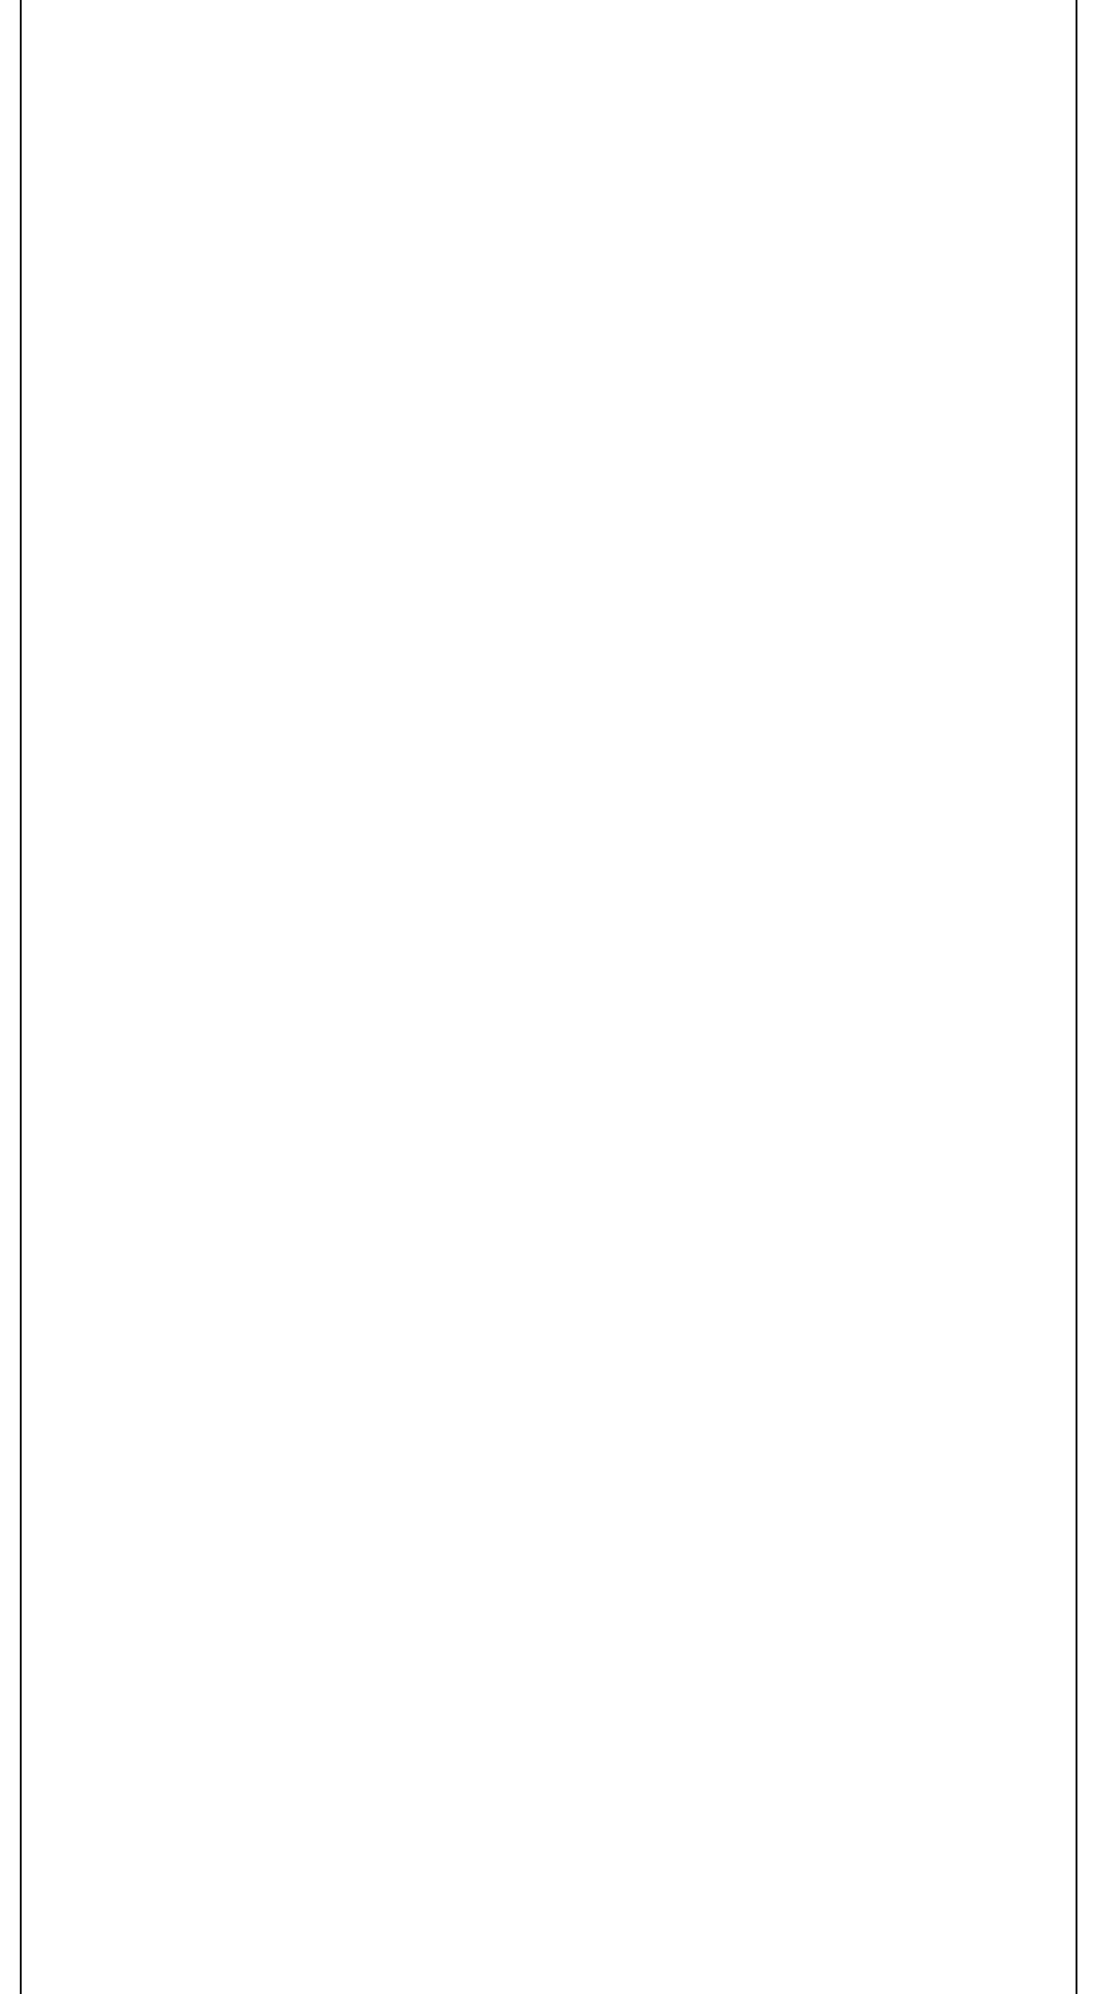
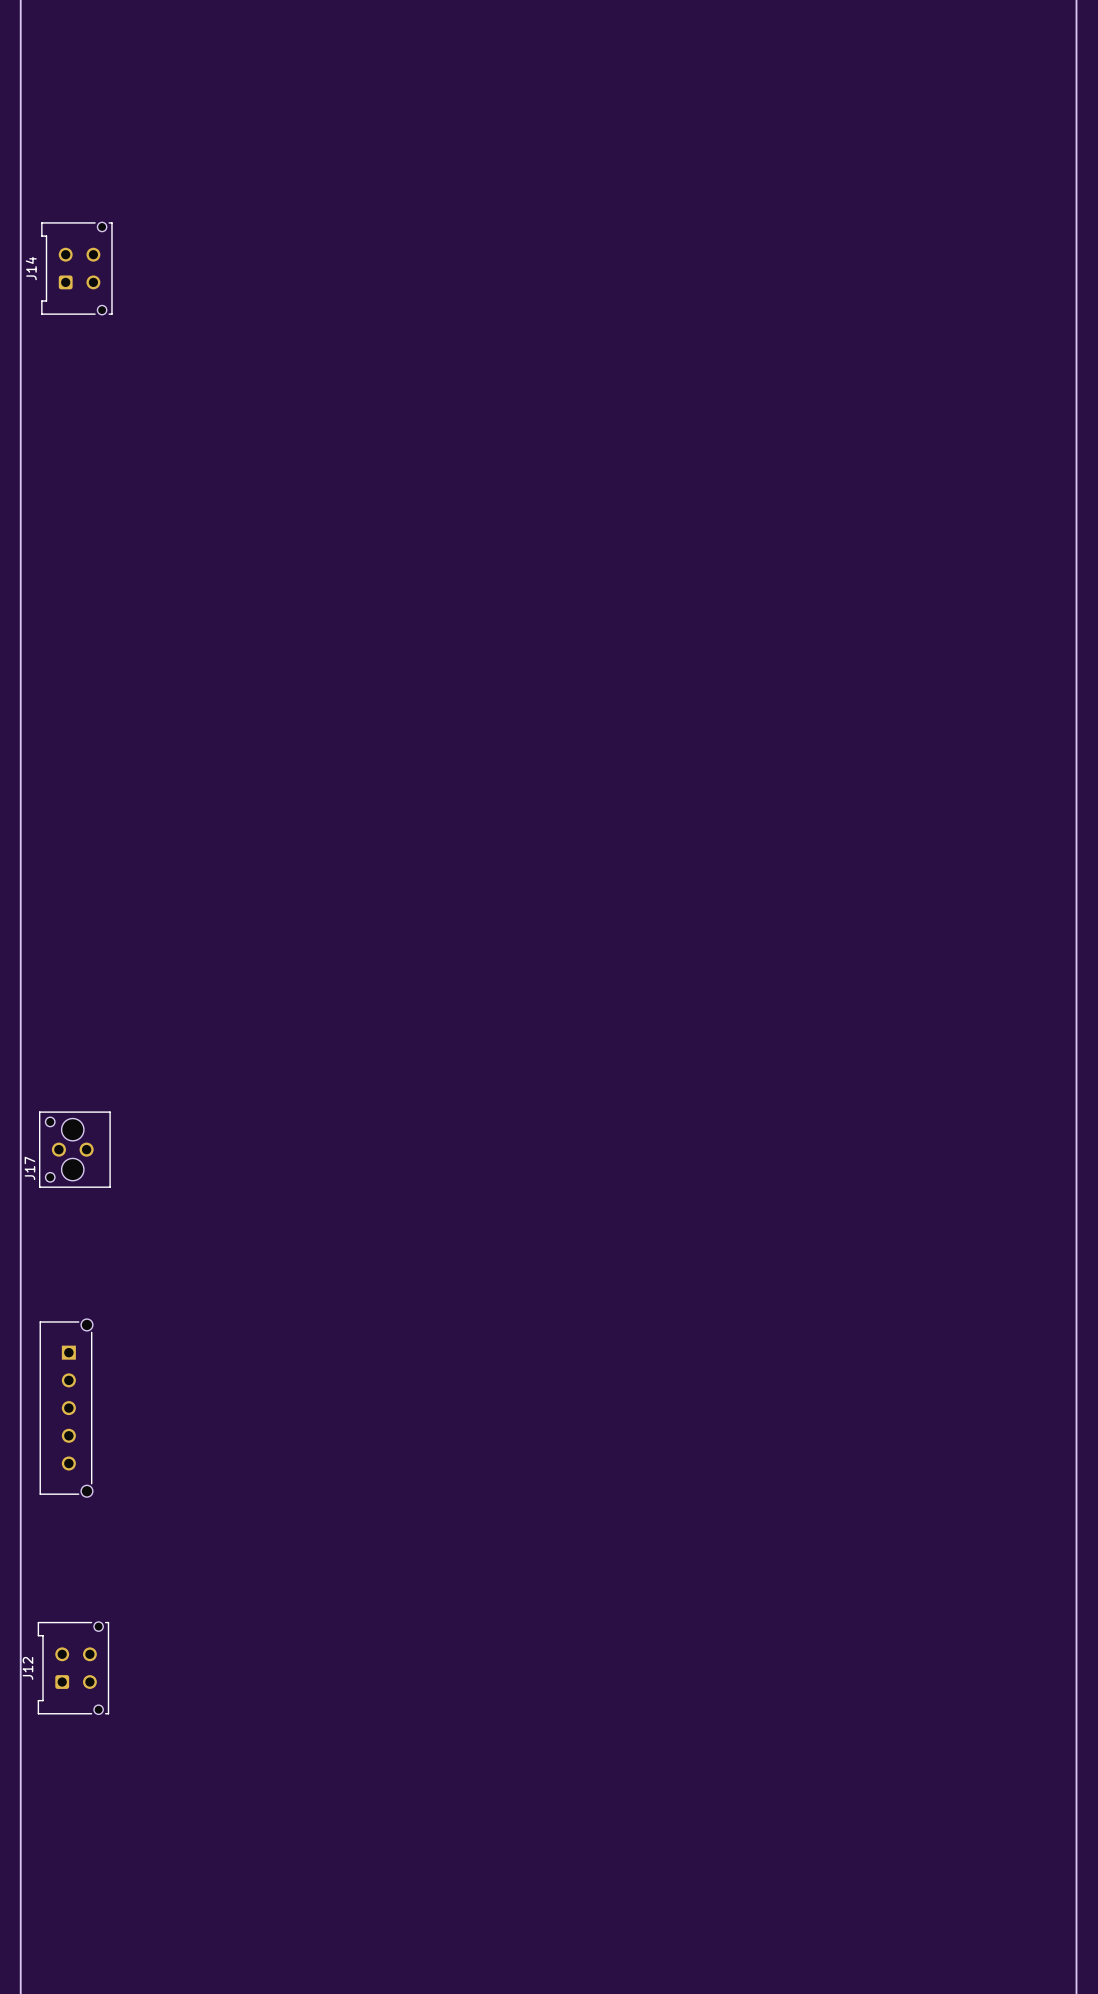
J14: none -> (76, 268)
J17: none -> (74, 1149)
part: none -> (66, 1408)
J12: none -> (73, 1668)

